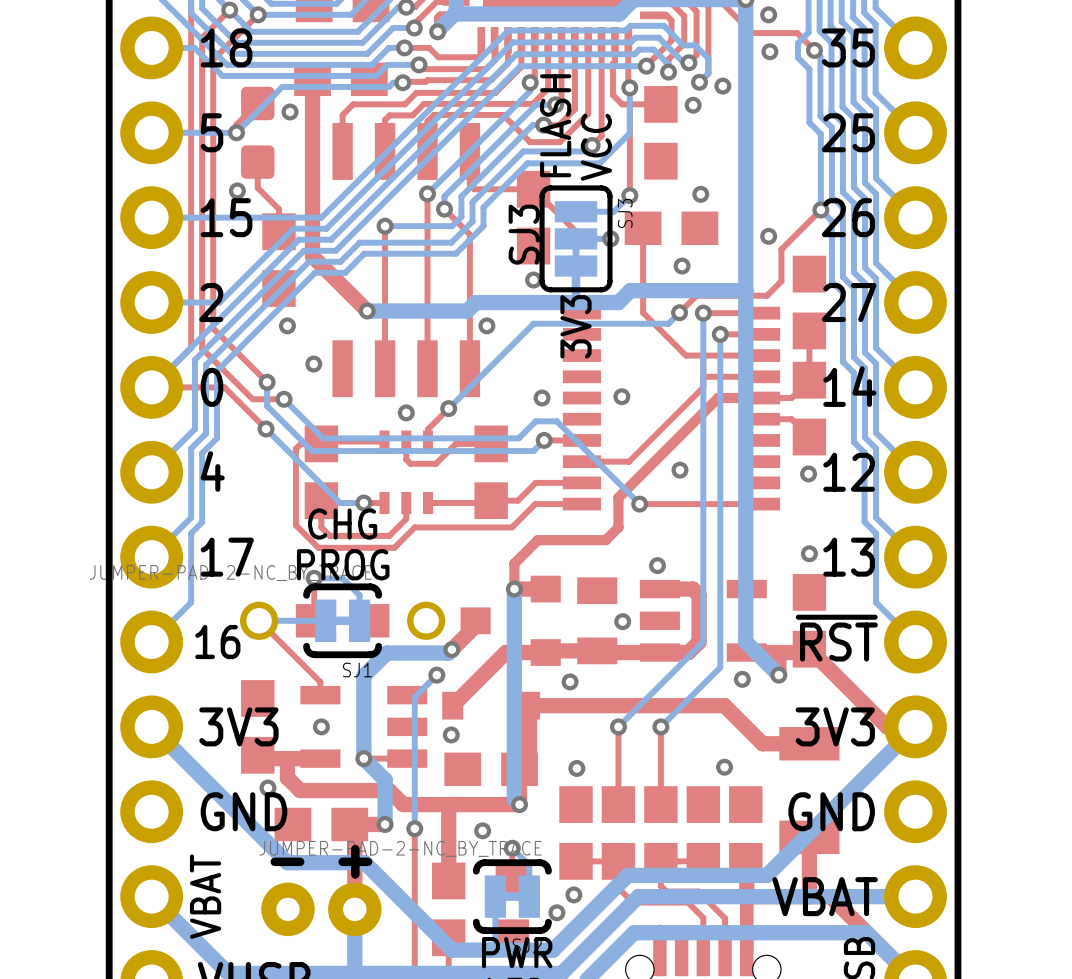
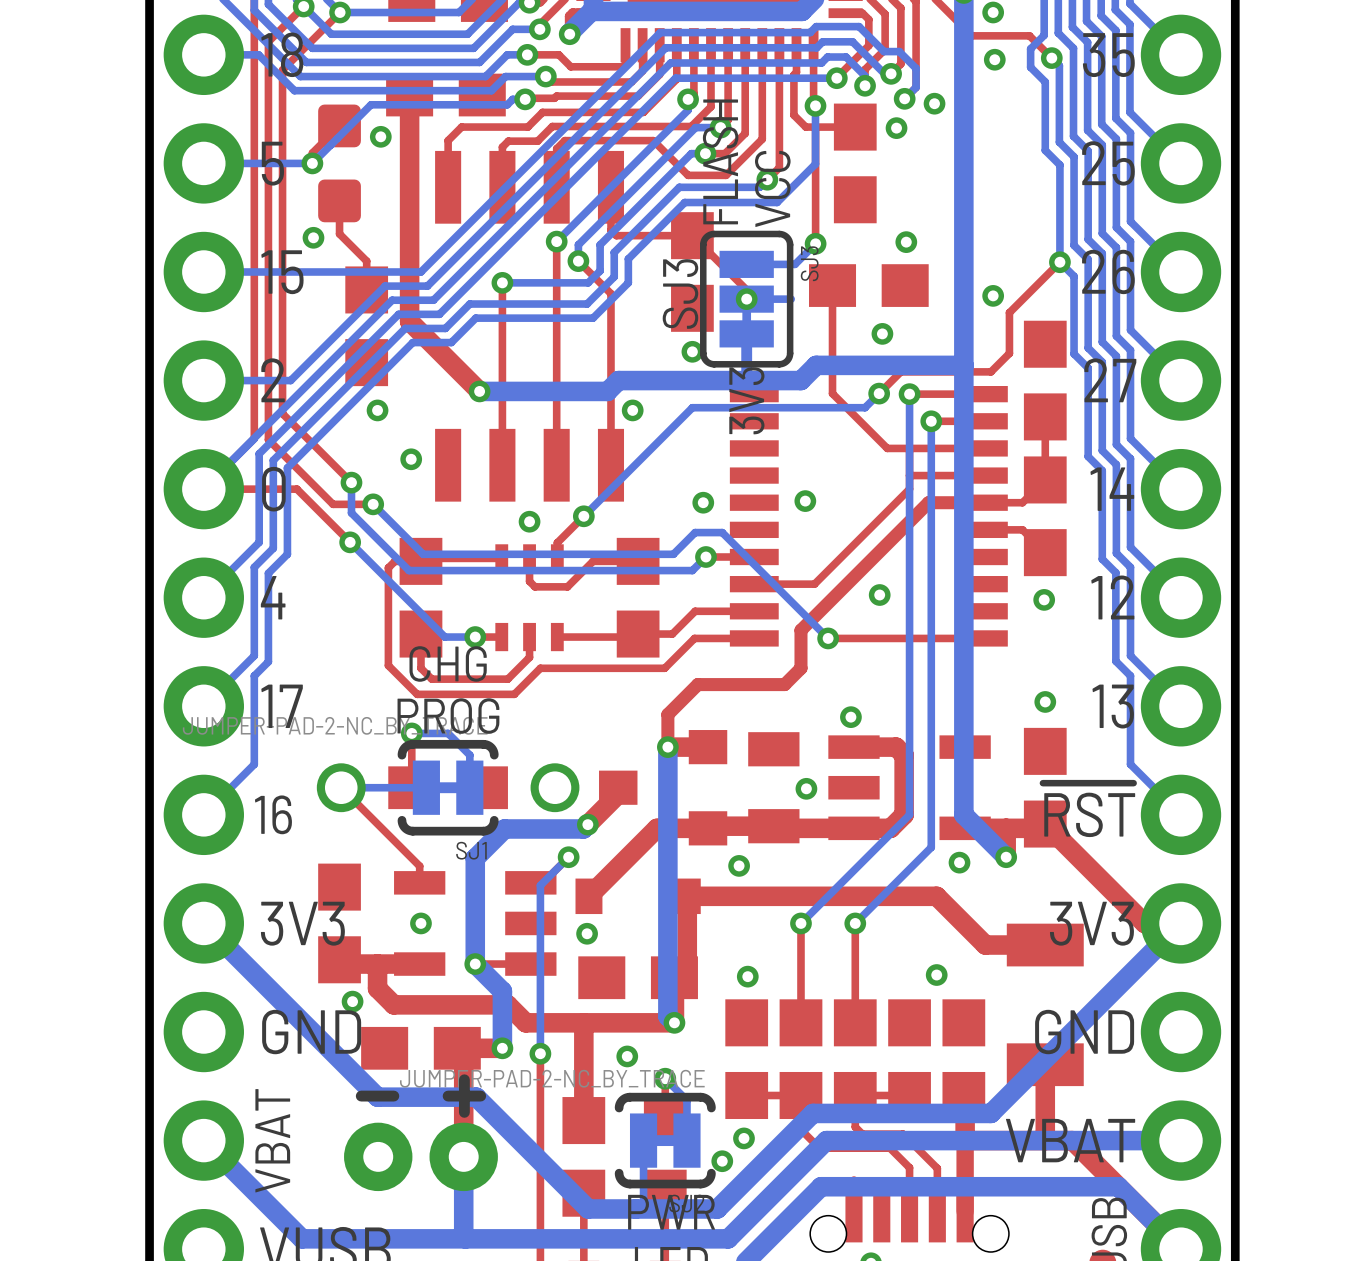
via position: (610, 238) -> (746, 299)

